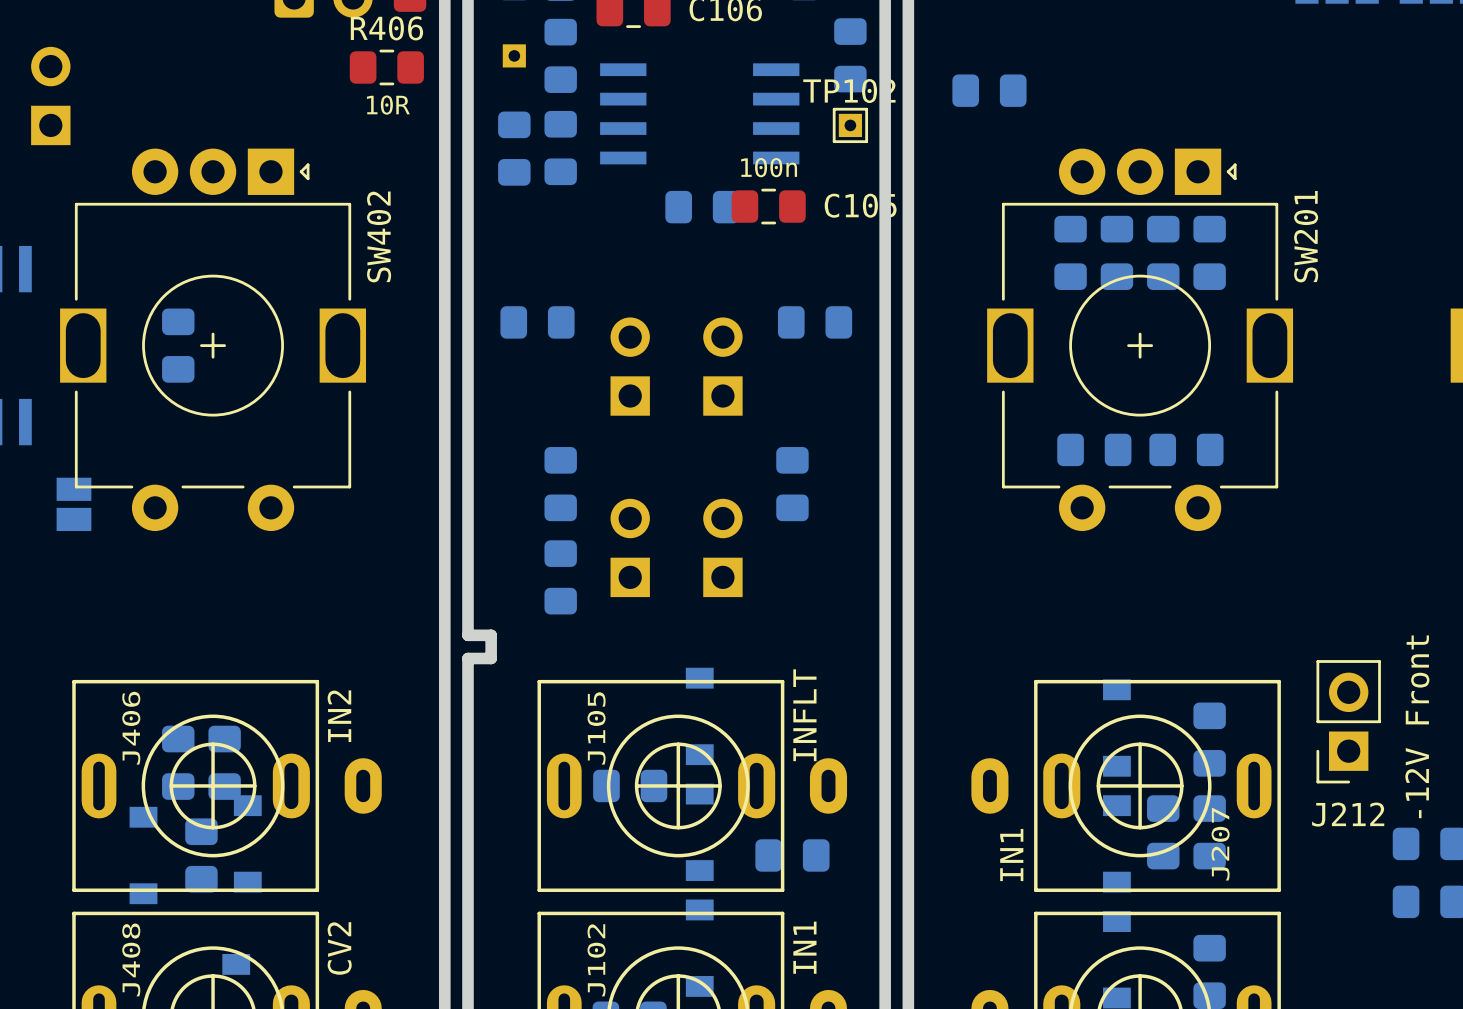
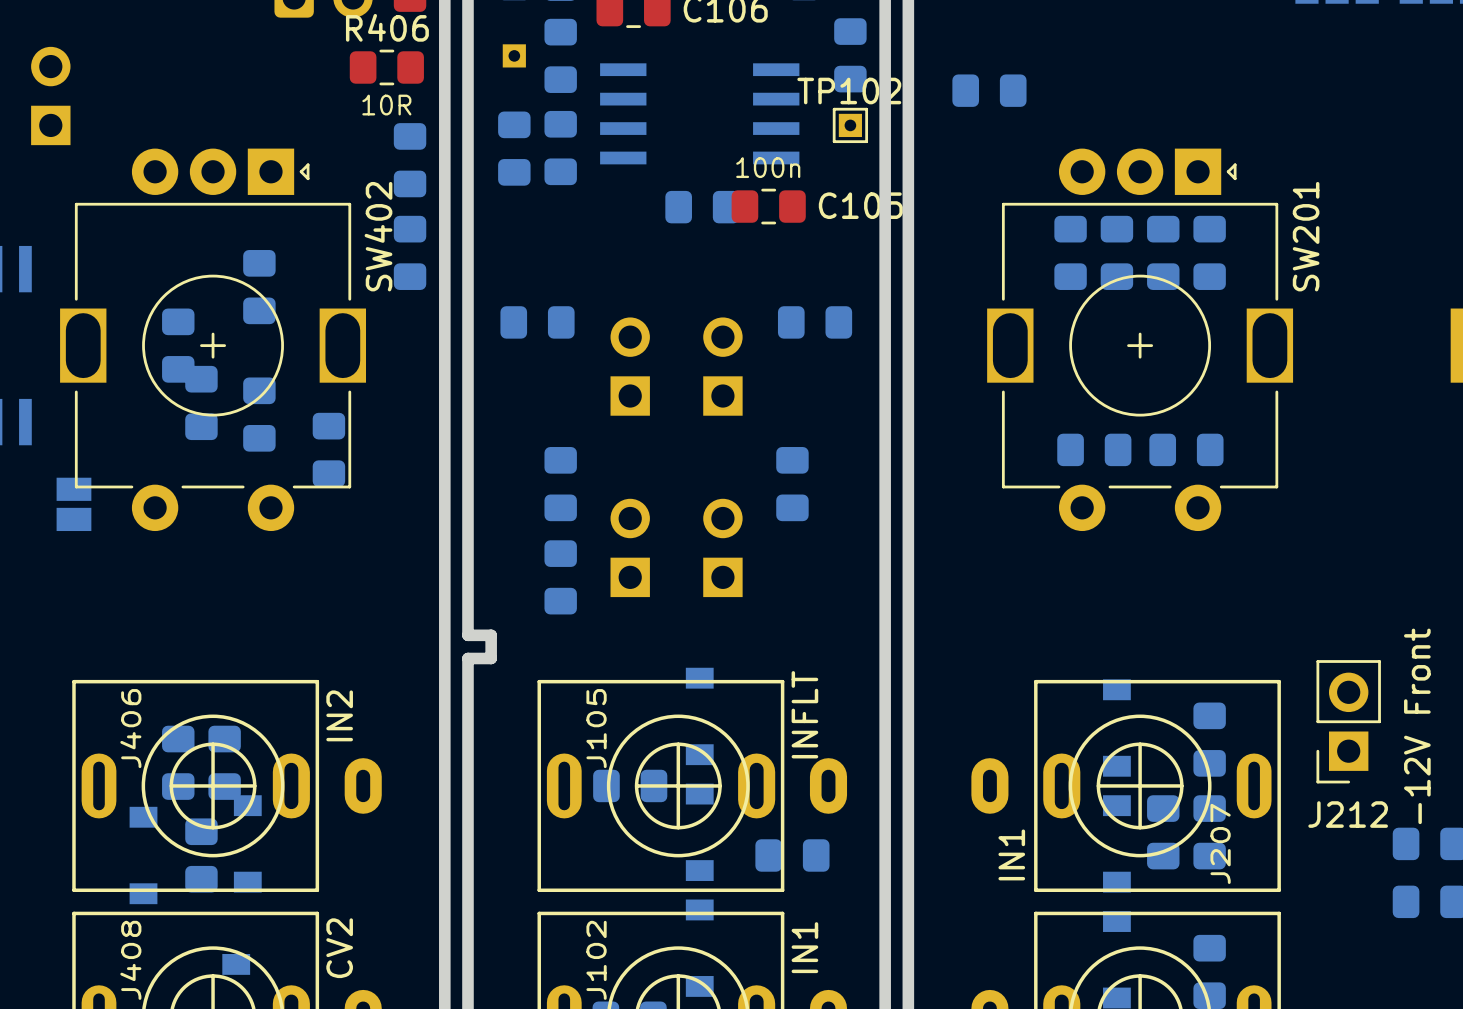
part: none -> (410, 160)
part: none -> (410, 252)
part: none -> (259, 287)
part: none -> (201, 402)
part: none -> (259, 414)
part: none -> (328, 449)

